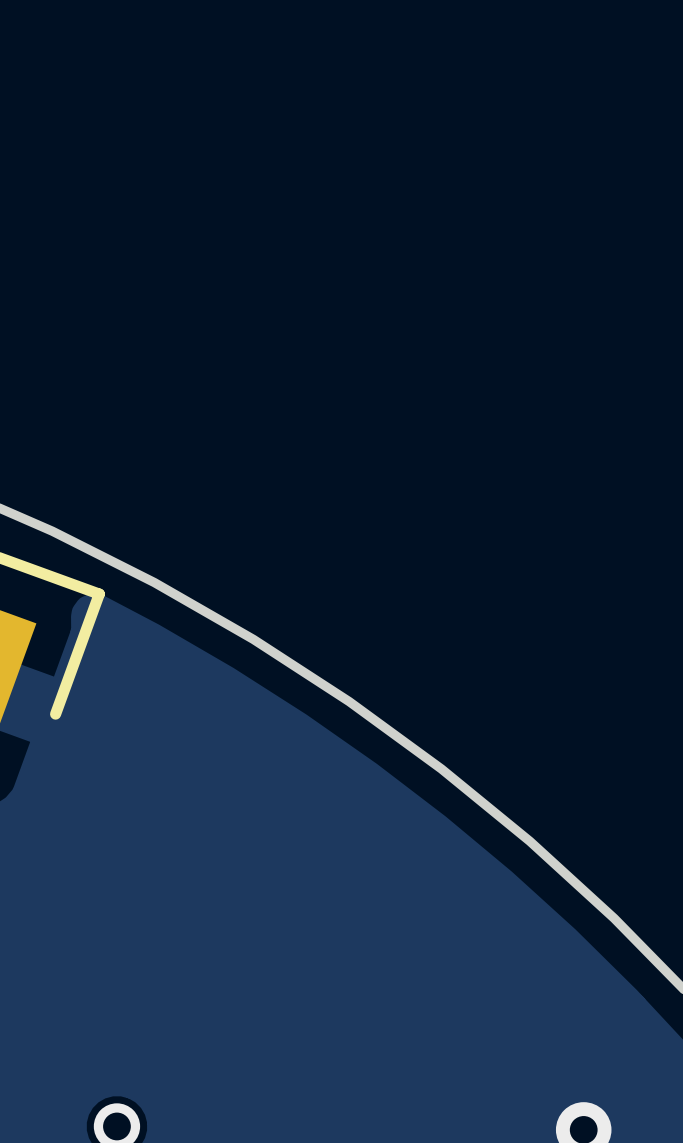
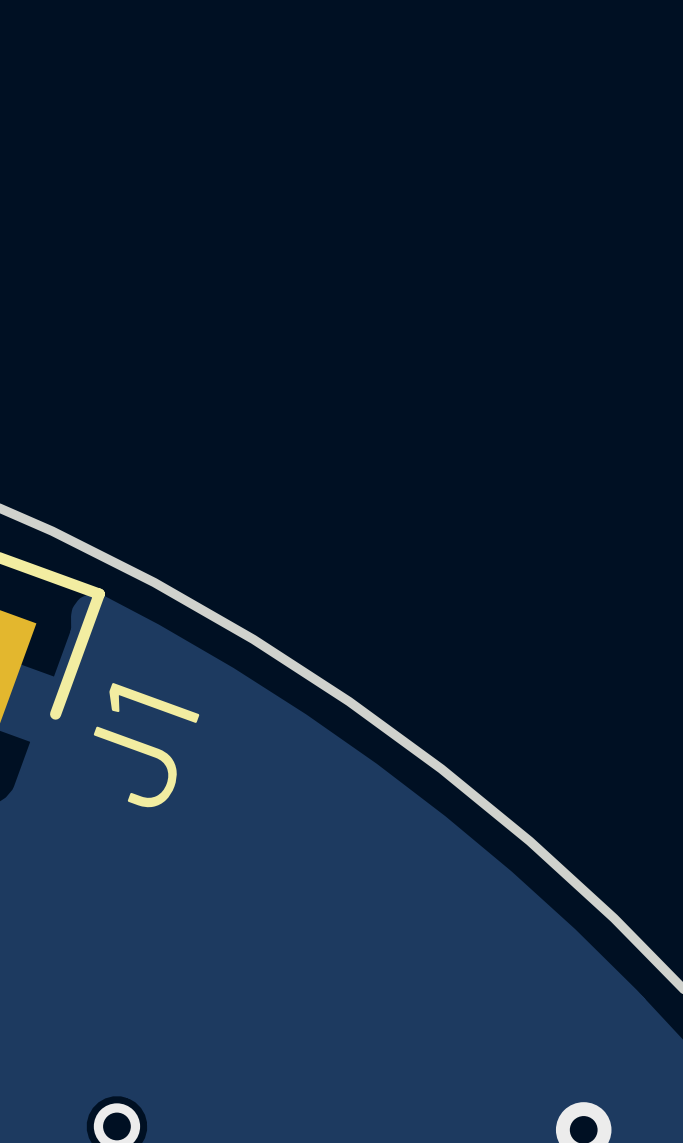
J1 name: none -> J1 (146, 745)

